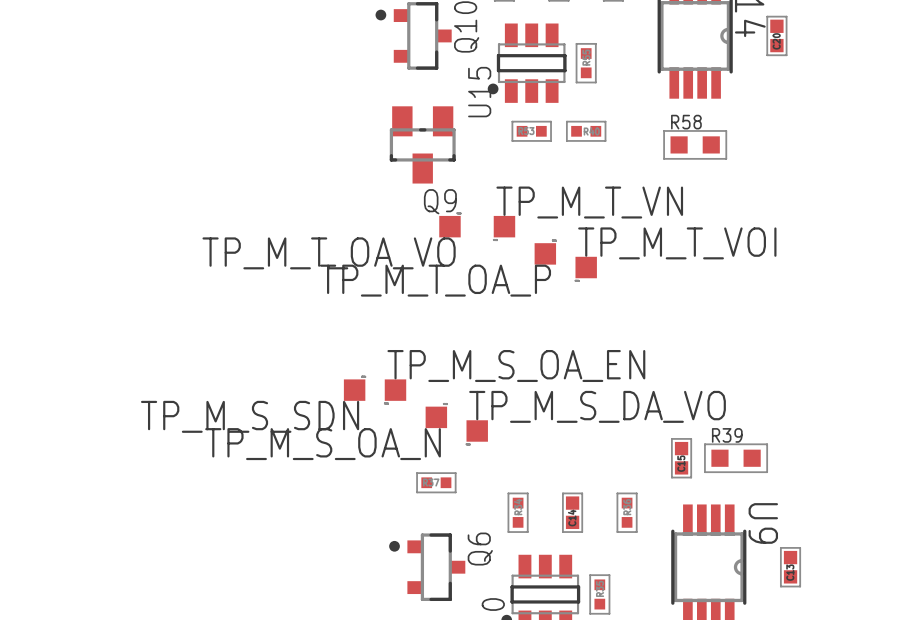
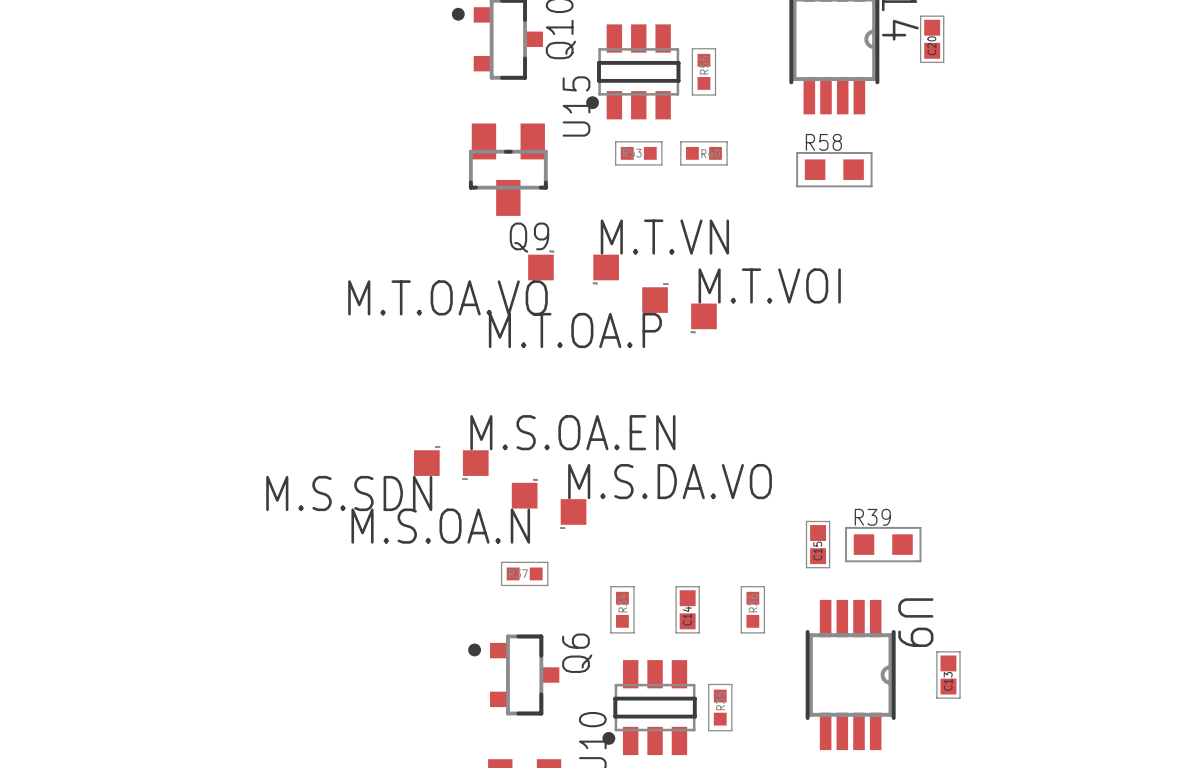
TP_M_T_VN name: TP_M_T_VN (589, 202) -> M.T.VN (664, 237)
TP_M_T_VOI name: TP_M_T_VOI (677, 243) -> M.T.VOI (769, 285)
TP_M_T_OA_VO name: TP_M_T_OA_VO (329, 253) -> M.T.OA.VO (447, 297)
TP_M_T_OA_P name: TP_M_T_OA_P (435, 280) -> M.T.OA.P (575, 330)
TP_M_S_OA_EN name: TP_M_S_OA_EN (516, 366) -> M.S.OA.EN (572, 432)
TP_M_S_DA_VO name: TP_M_S_DA_VO (597, 406) -> M.S.DA.VO (670, 481)
TP_M_S_SDN name: TP_M_S_SDN (250, 416) -> M.S.SDN (349, 493)
TP_M_S_OA_N name: TP_M_S_OA_N (323, 444) -> M.S.OA.N (440, 526)

